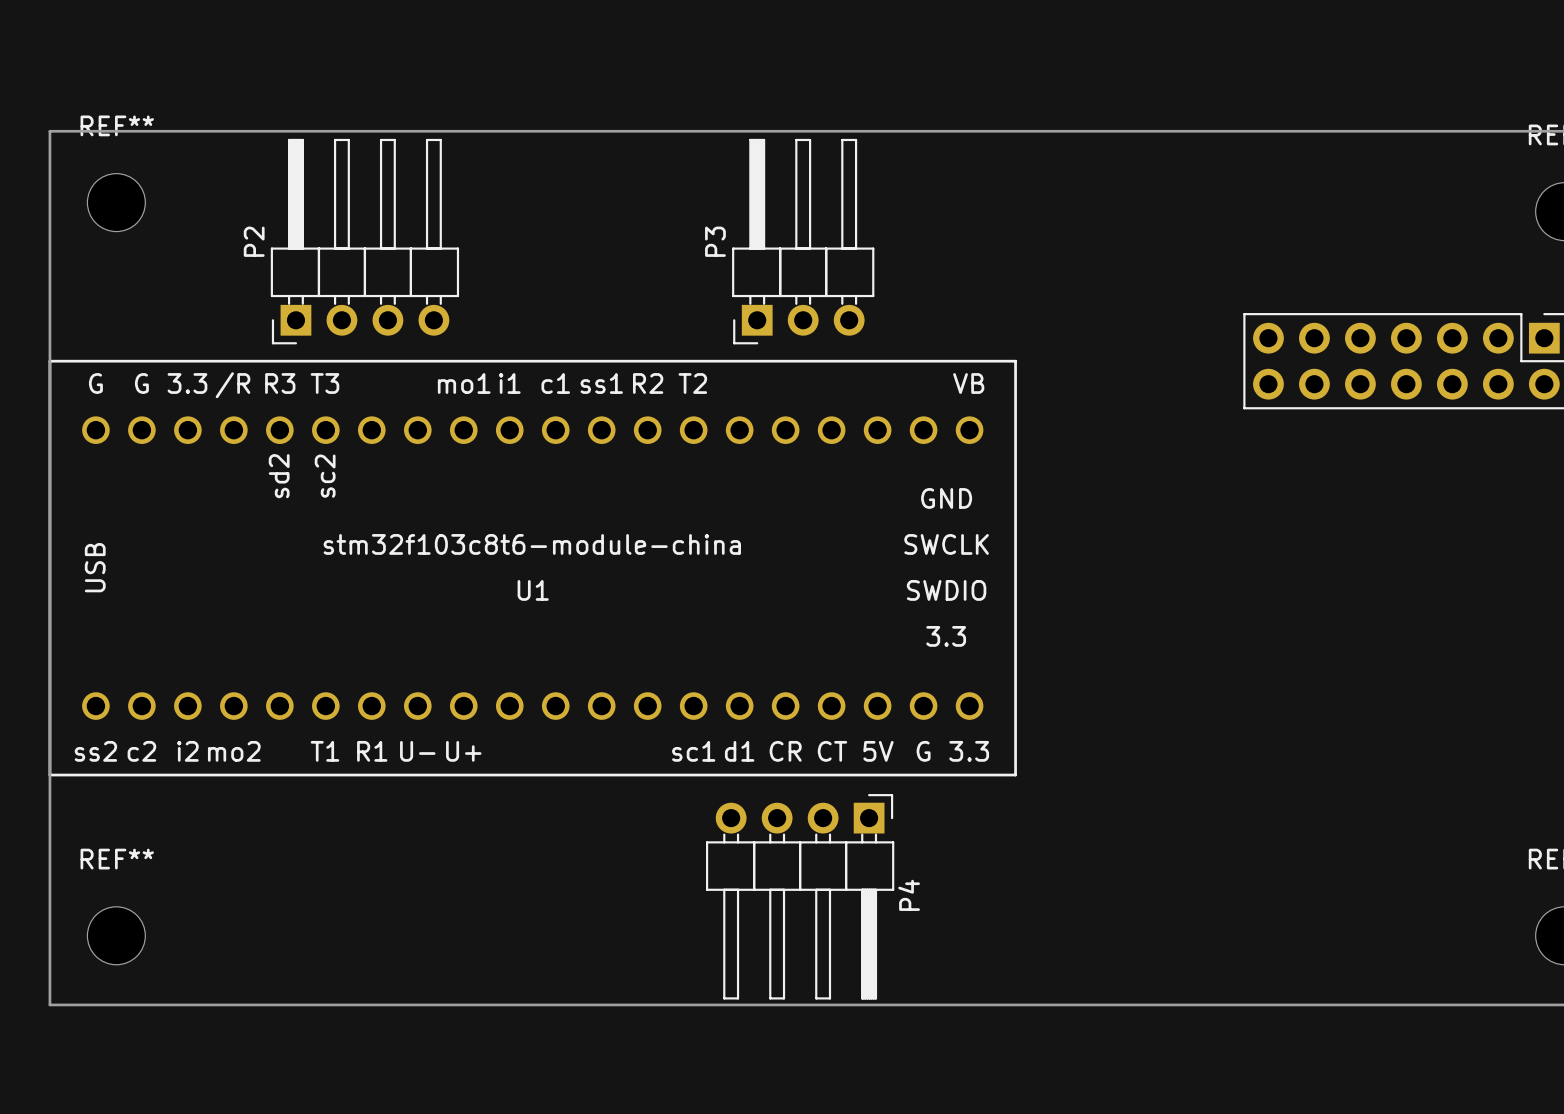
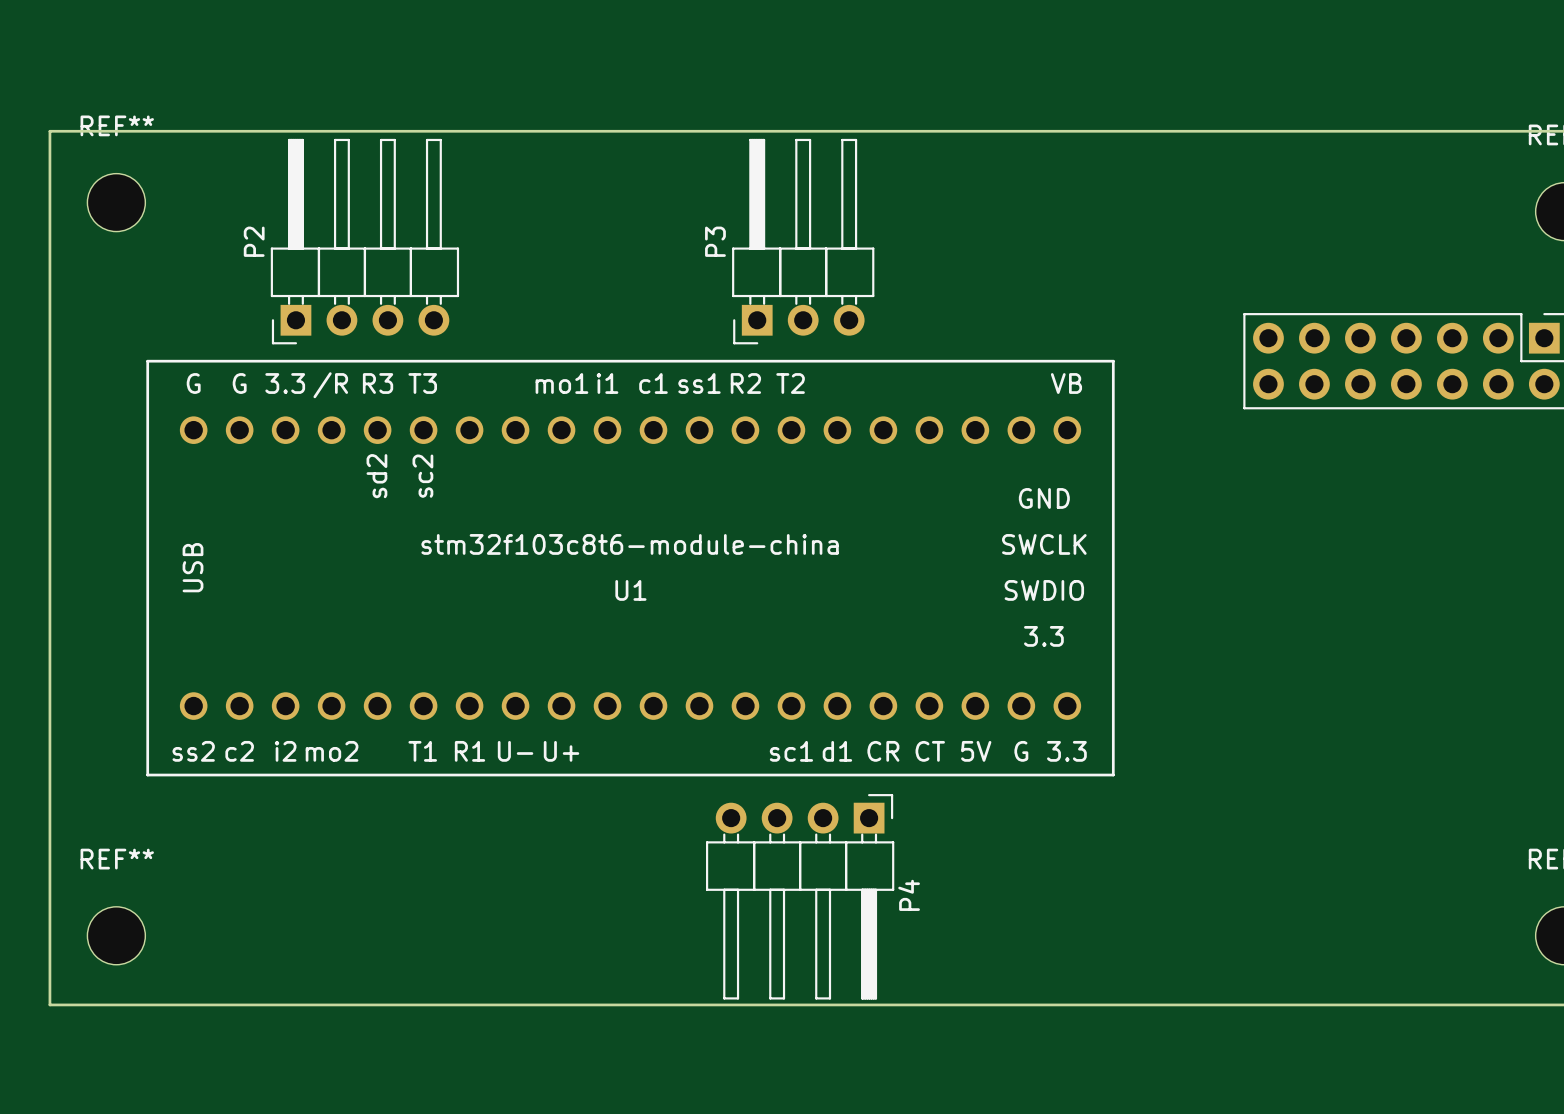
U1 position: (532, 568) -> (630, 568)

